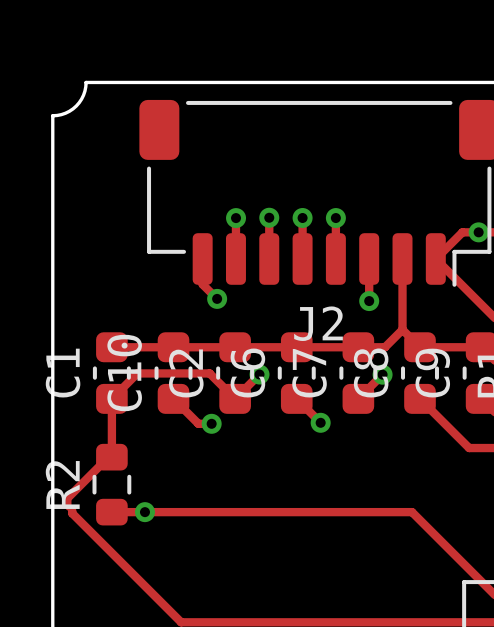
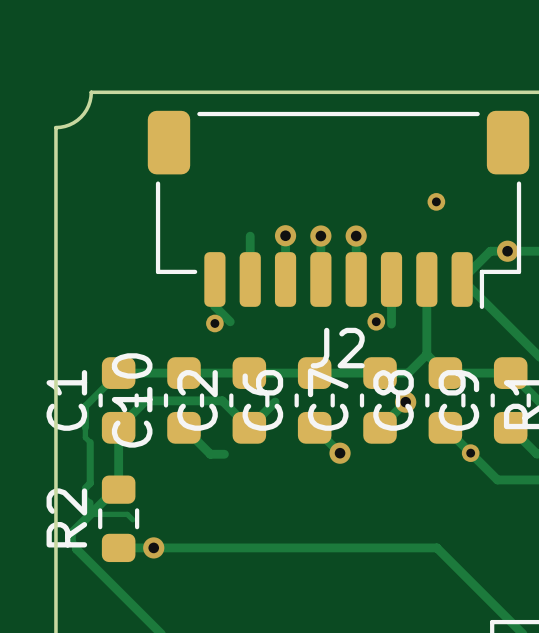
via: none -> (436, 201)
via: (236, 218) -> none
via position: (217, 298) -> (214, 323)
via position: (369, 301) -> (376, 321)
track: none -> (118, 373) (85, 406) (85, 437) (90, 442) (90, 483) (85, 488) (85, 498) (89, 502) (89, 514) (127, 514) (132, 519)
via: (259, 374) -> none
via: none -> (470, 453)
via: (211, 423) -> none

